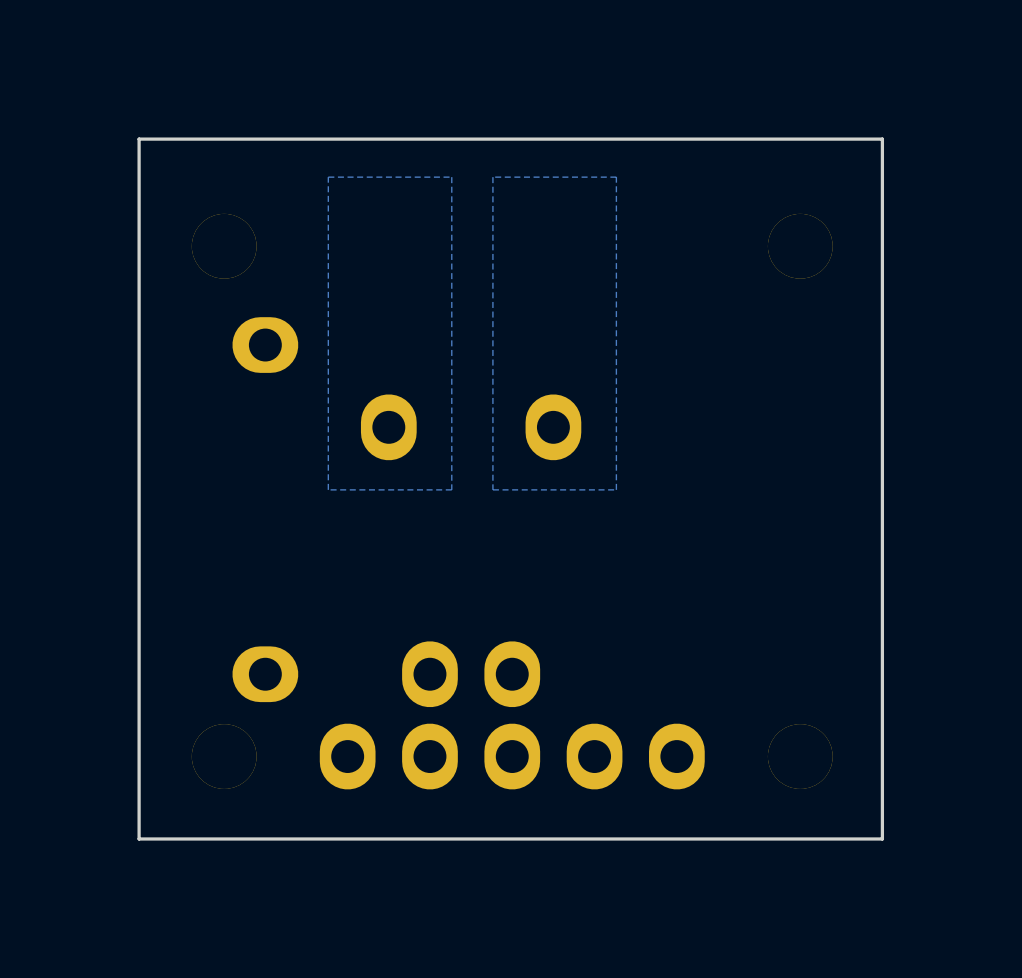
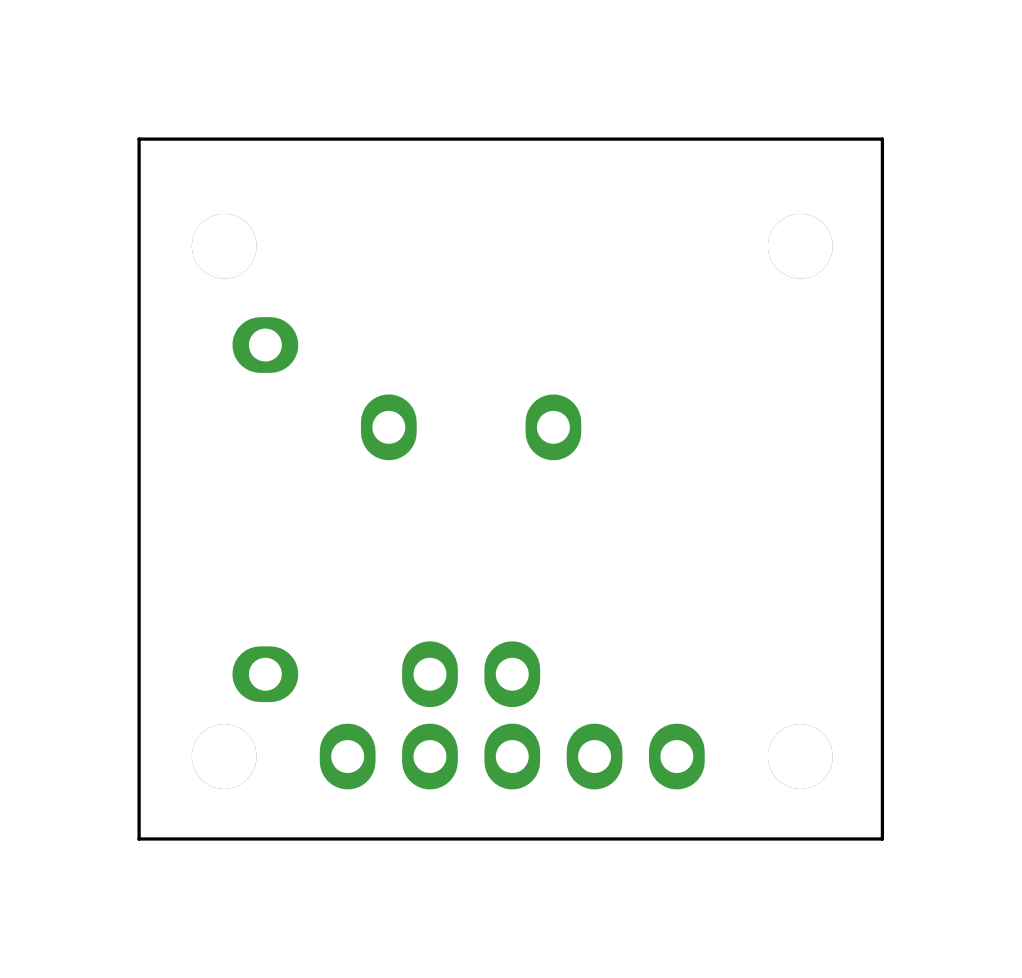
zone outline: (451, 177) (328, 177) (328, 489) (451, 489) (451, 177) -> none
zone outline: (616, 177) (616, 489) (492, 489) (492, 177) (616, 177) -> none

